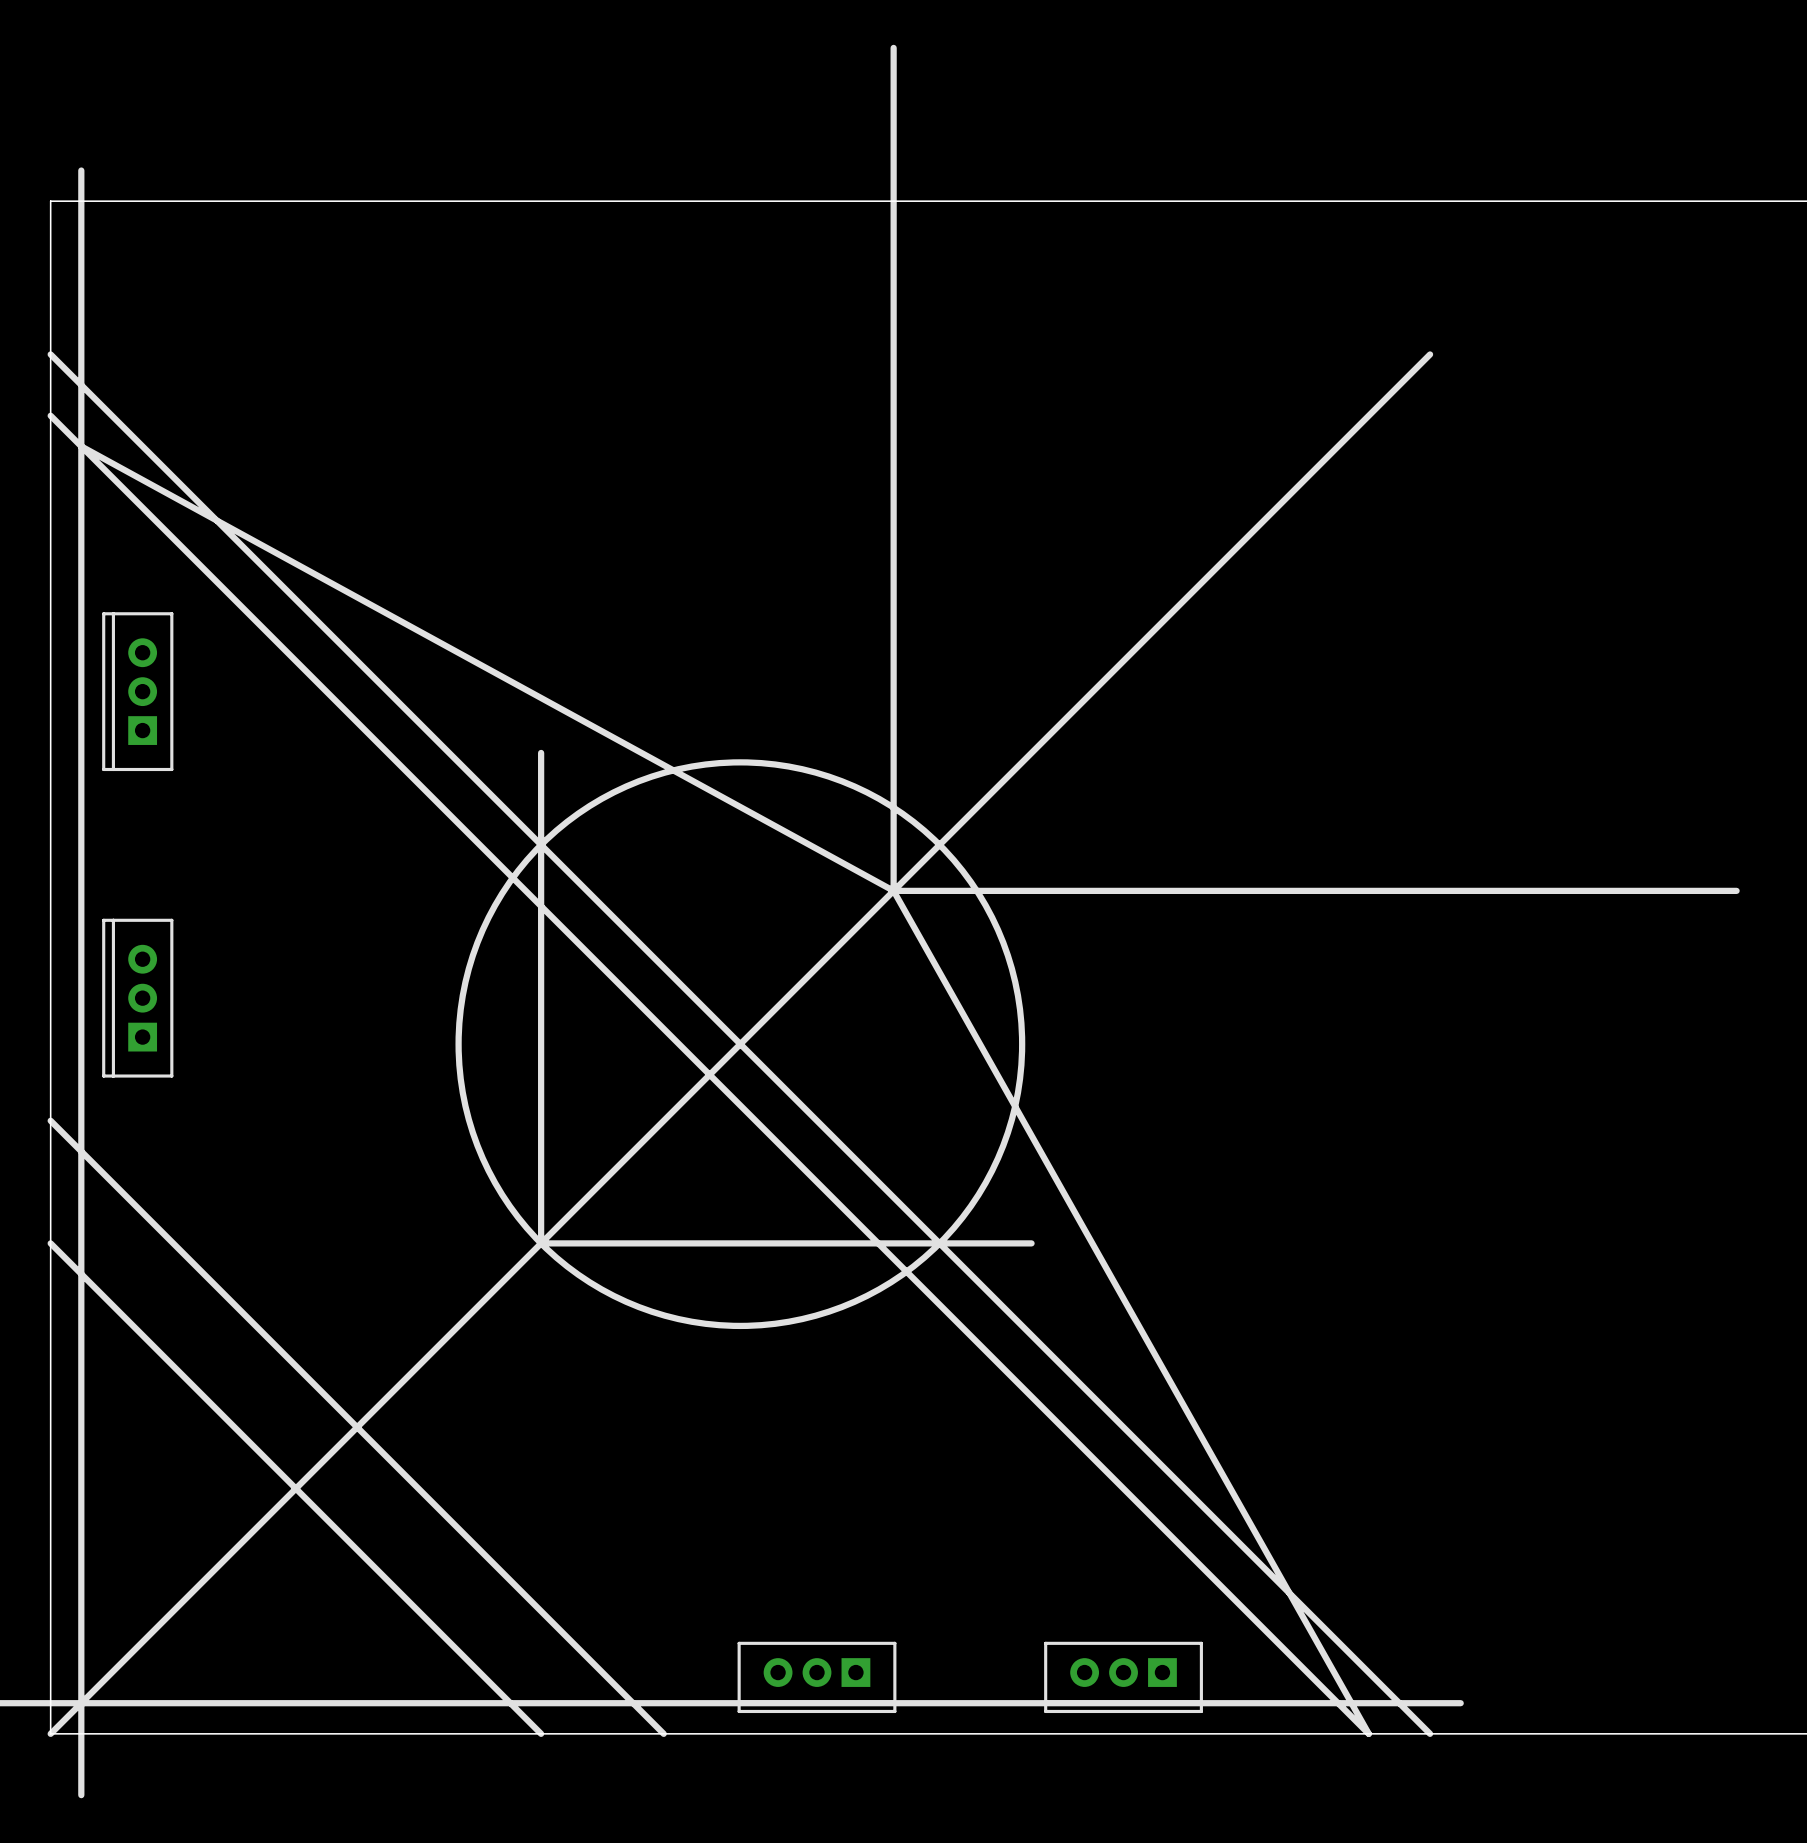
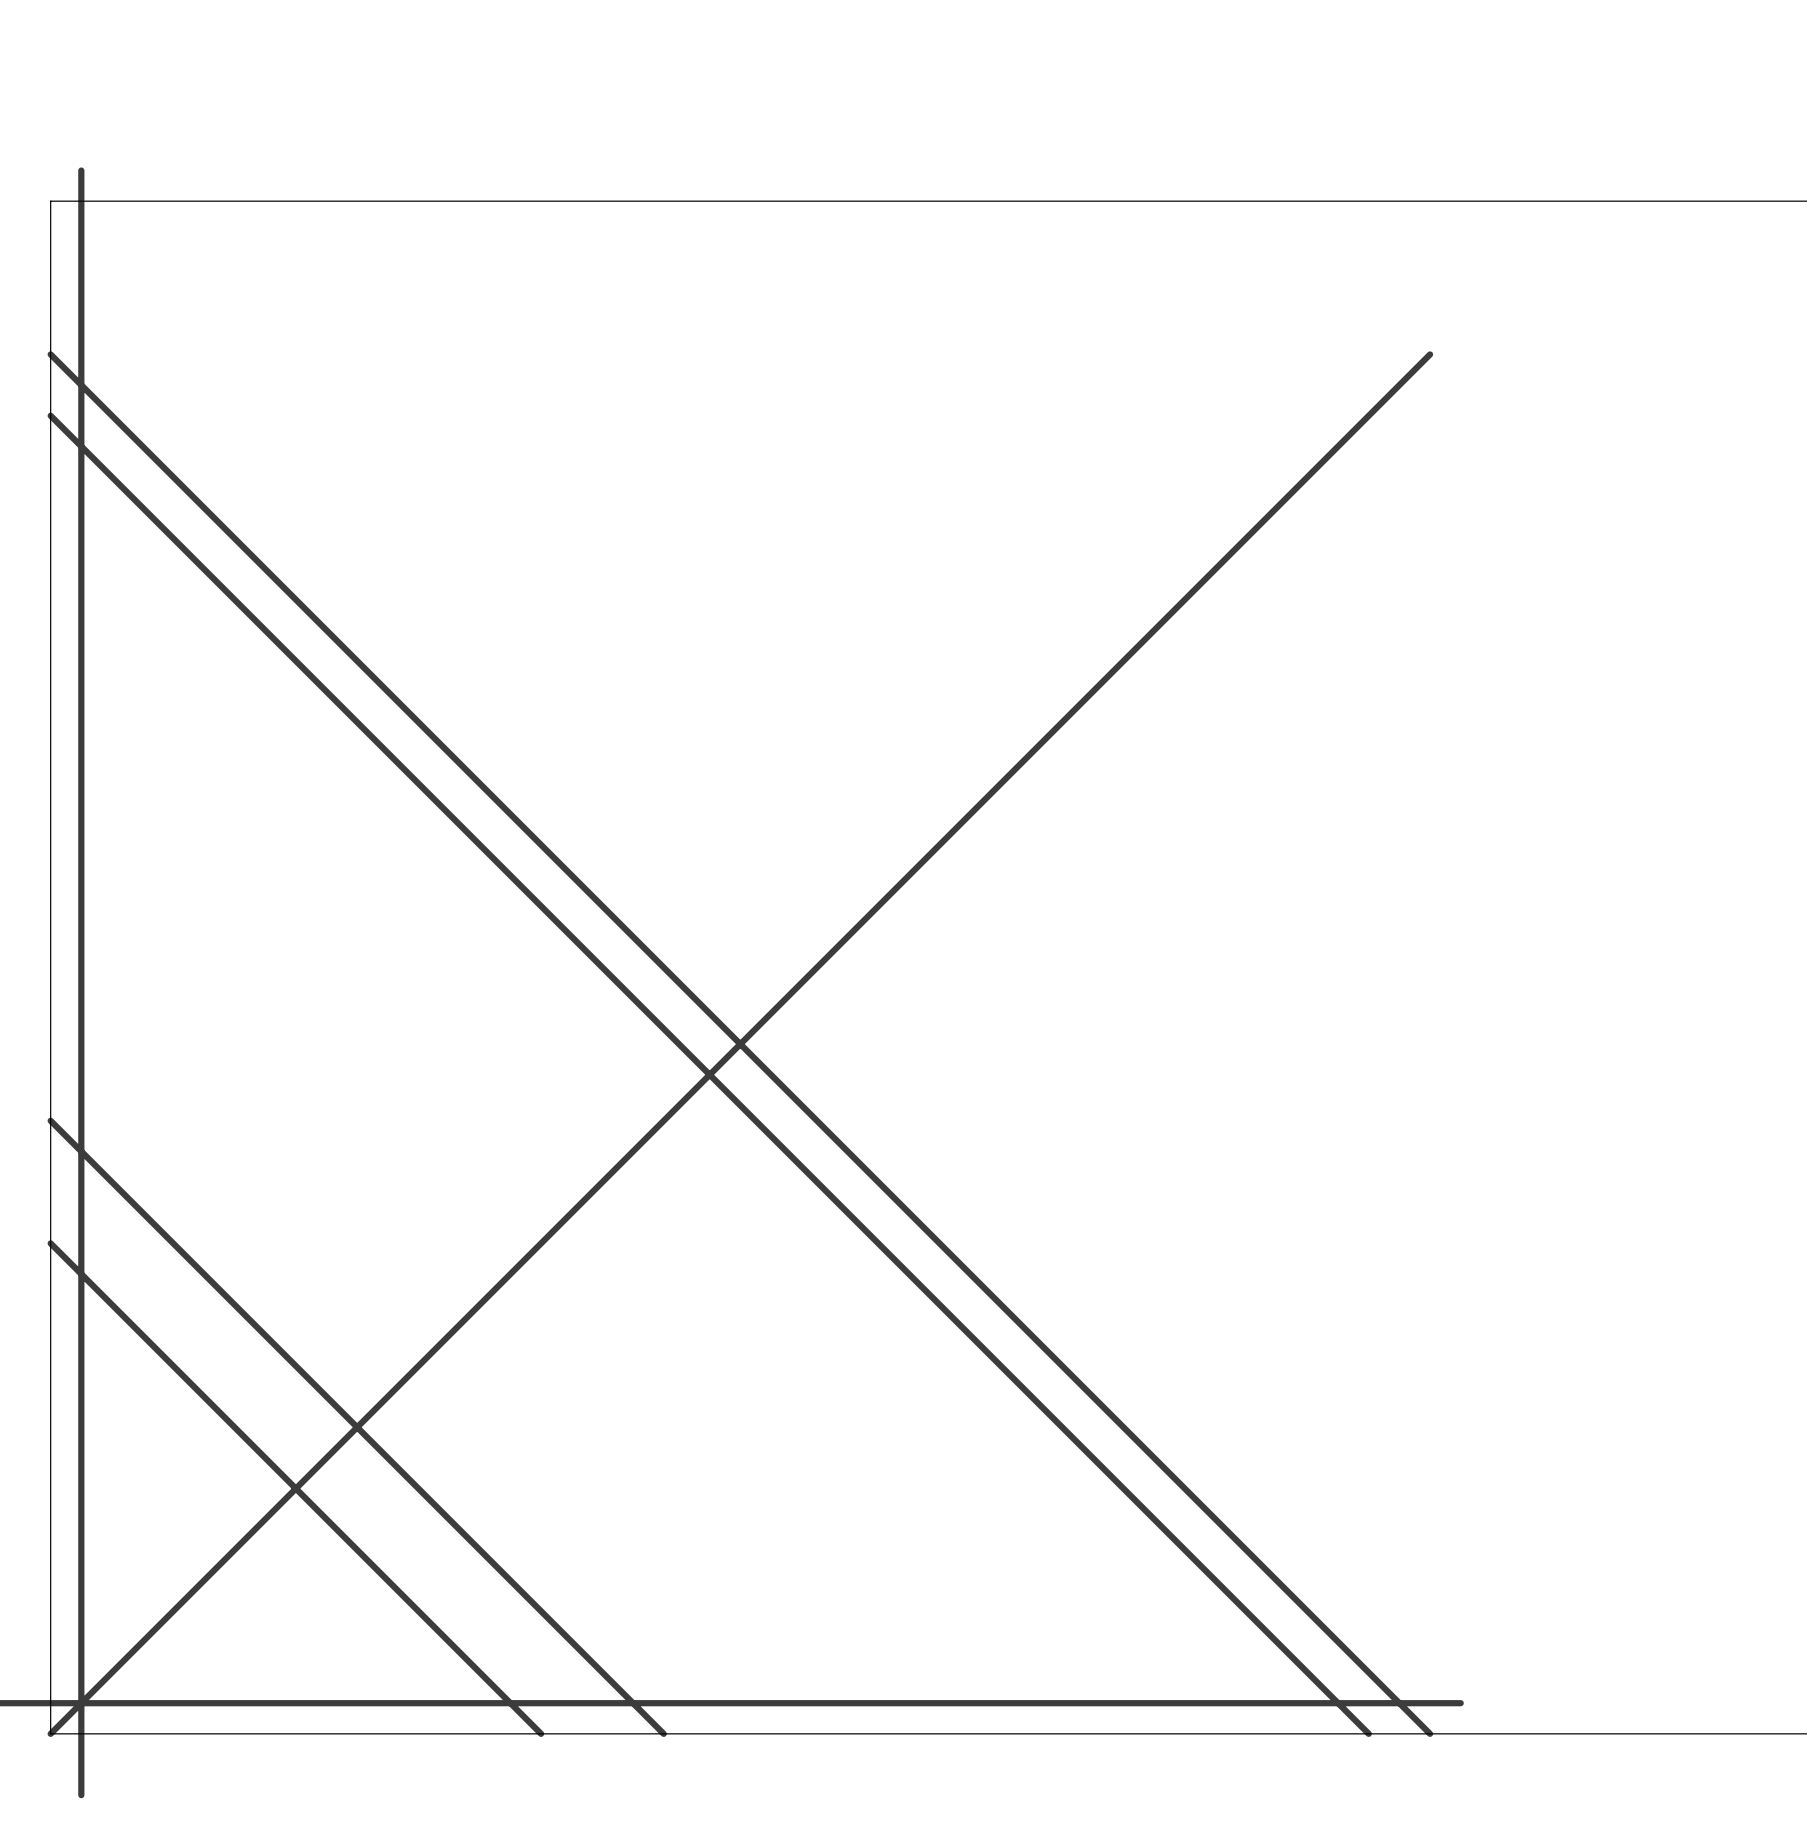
line: (893, 47) (893, 890) -> none
line: (81, 446) (893, 890) -> none
part: (137, 691) -> none
line: (541, 752) (541, 1243) (1031, 1243) -> none
drawing: [455, 759, 1026, 1330] -> none
line: (893, 890) (1736, 890) -> none
line: (893, 890) (1368, 1733) -> none
part: (137, 998) -> none
part: (817, 1677) -> none
part: (1123, 1677) -> none

